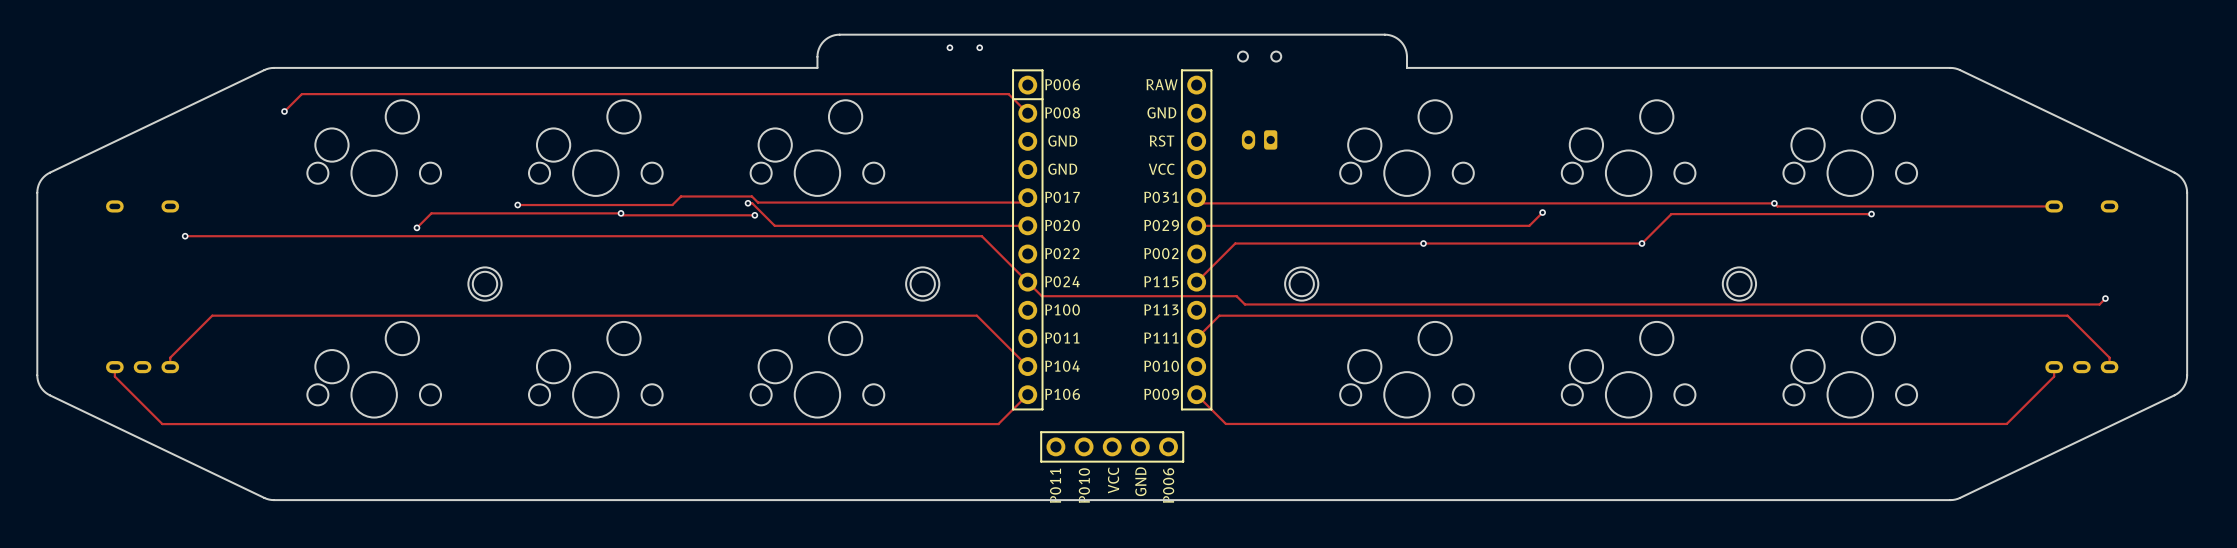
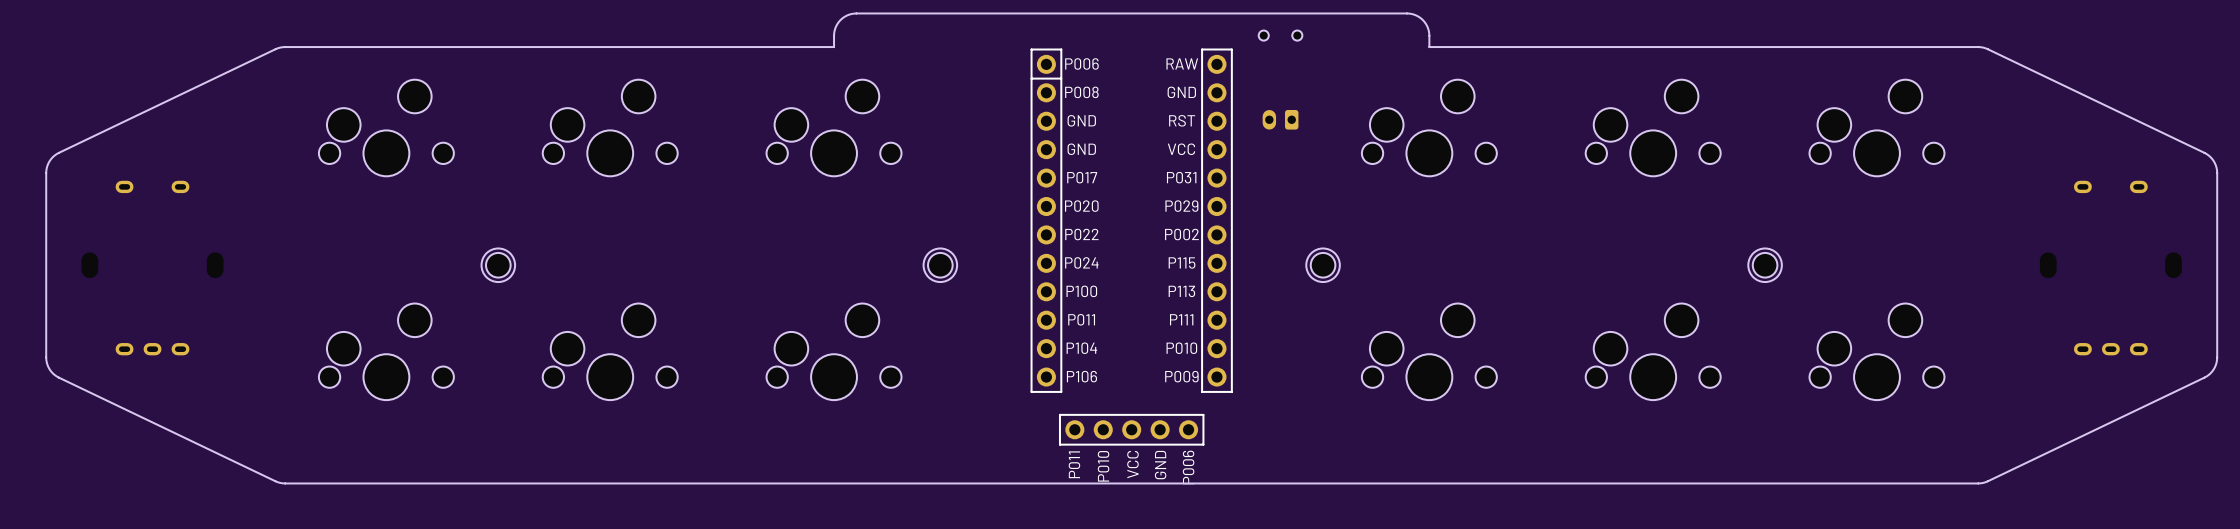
via: (949, 47) -> none
via: (979, 47) -> none
track: (284, 111) (301, 94) (1008, 94) (1027, 113) -> none
via: (284, 111) -> none
track: (1027, 197) (1022, 202) (758, 202) (751, 196) (680, 196) (672, 205) (517, 205) -> none
track: (1196, 197) (1202, 203) (1774, 203) (1777, 206) (2054, 206) -> none
track: (748, 203) (752, 203) (774, 225) (1027, 225) -> none
via: (748, 203) -> none
via: (1774, 203) -> none
via: (517, 205) -> none
track: (1542, 212) (1529, 225) (1196, 225) -> none
via: (1542, 212) -> none
via: (621, 213) -> none
track: (1871, 214) (1671, 214) (1641, 243) (1235, 243) (1196, 282) -> none
via: (1871, 214) -> none
track: (754, 215) (431, 213) (416, 227) -> none
via: (754, 215) -> none
via: (416, 227) -> none
track: (185, 236) (981, 236) (1041, 296) (1236, 296) (1244, 304) (2099, 304) (2105, 298) -> none
via: (185, 236) -> none
via: (1423, 243) -> none
via: (1641, 243) -> none
via: (2105, 298) -> none
track: (1196, 338) (1219, 315) (2067, 315) (2109, 357) (2109, 367) -> none
track: (1027, 366) (976, 315) (212, 315) (170, 357) (170, 367) -> none
track: (114, 367) (114, 376) (162, 424) (998, 424) (1027, 394) -> none
track: (2054, 367) (2054, 376) (2006, 423) (1225, 423) (1196, 394) -> none

